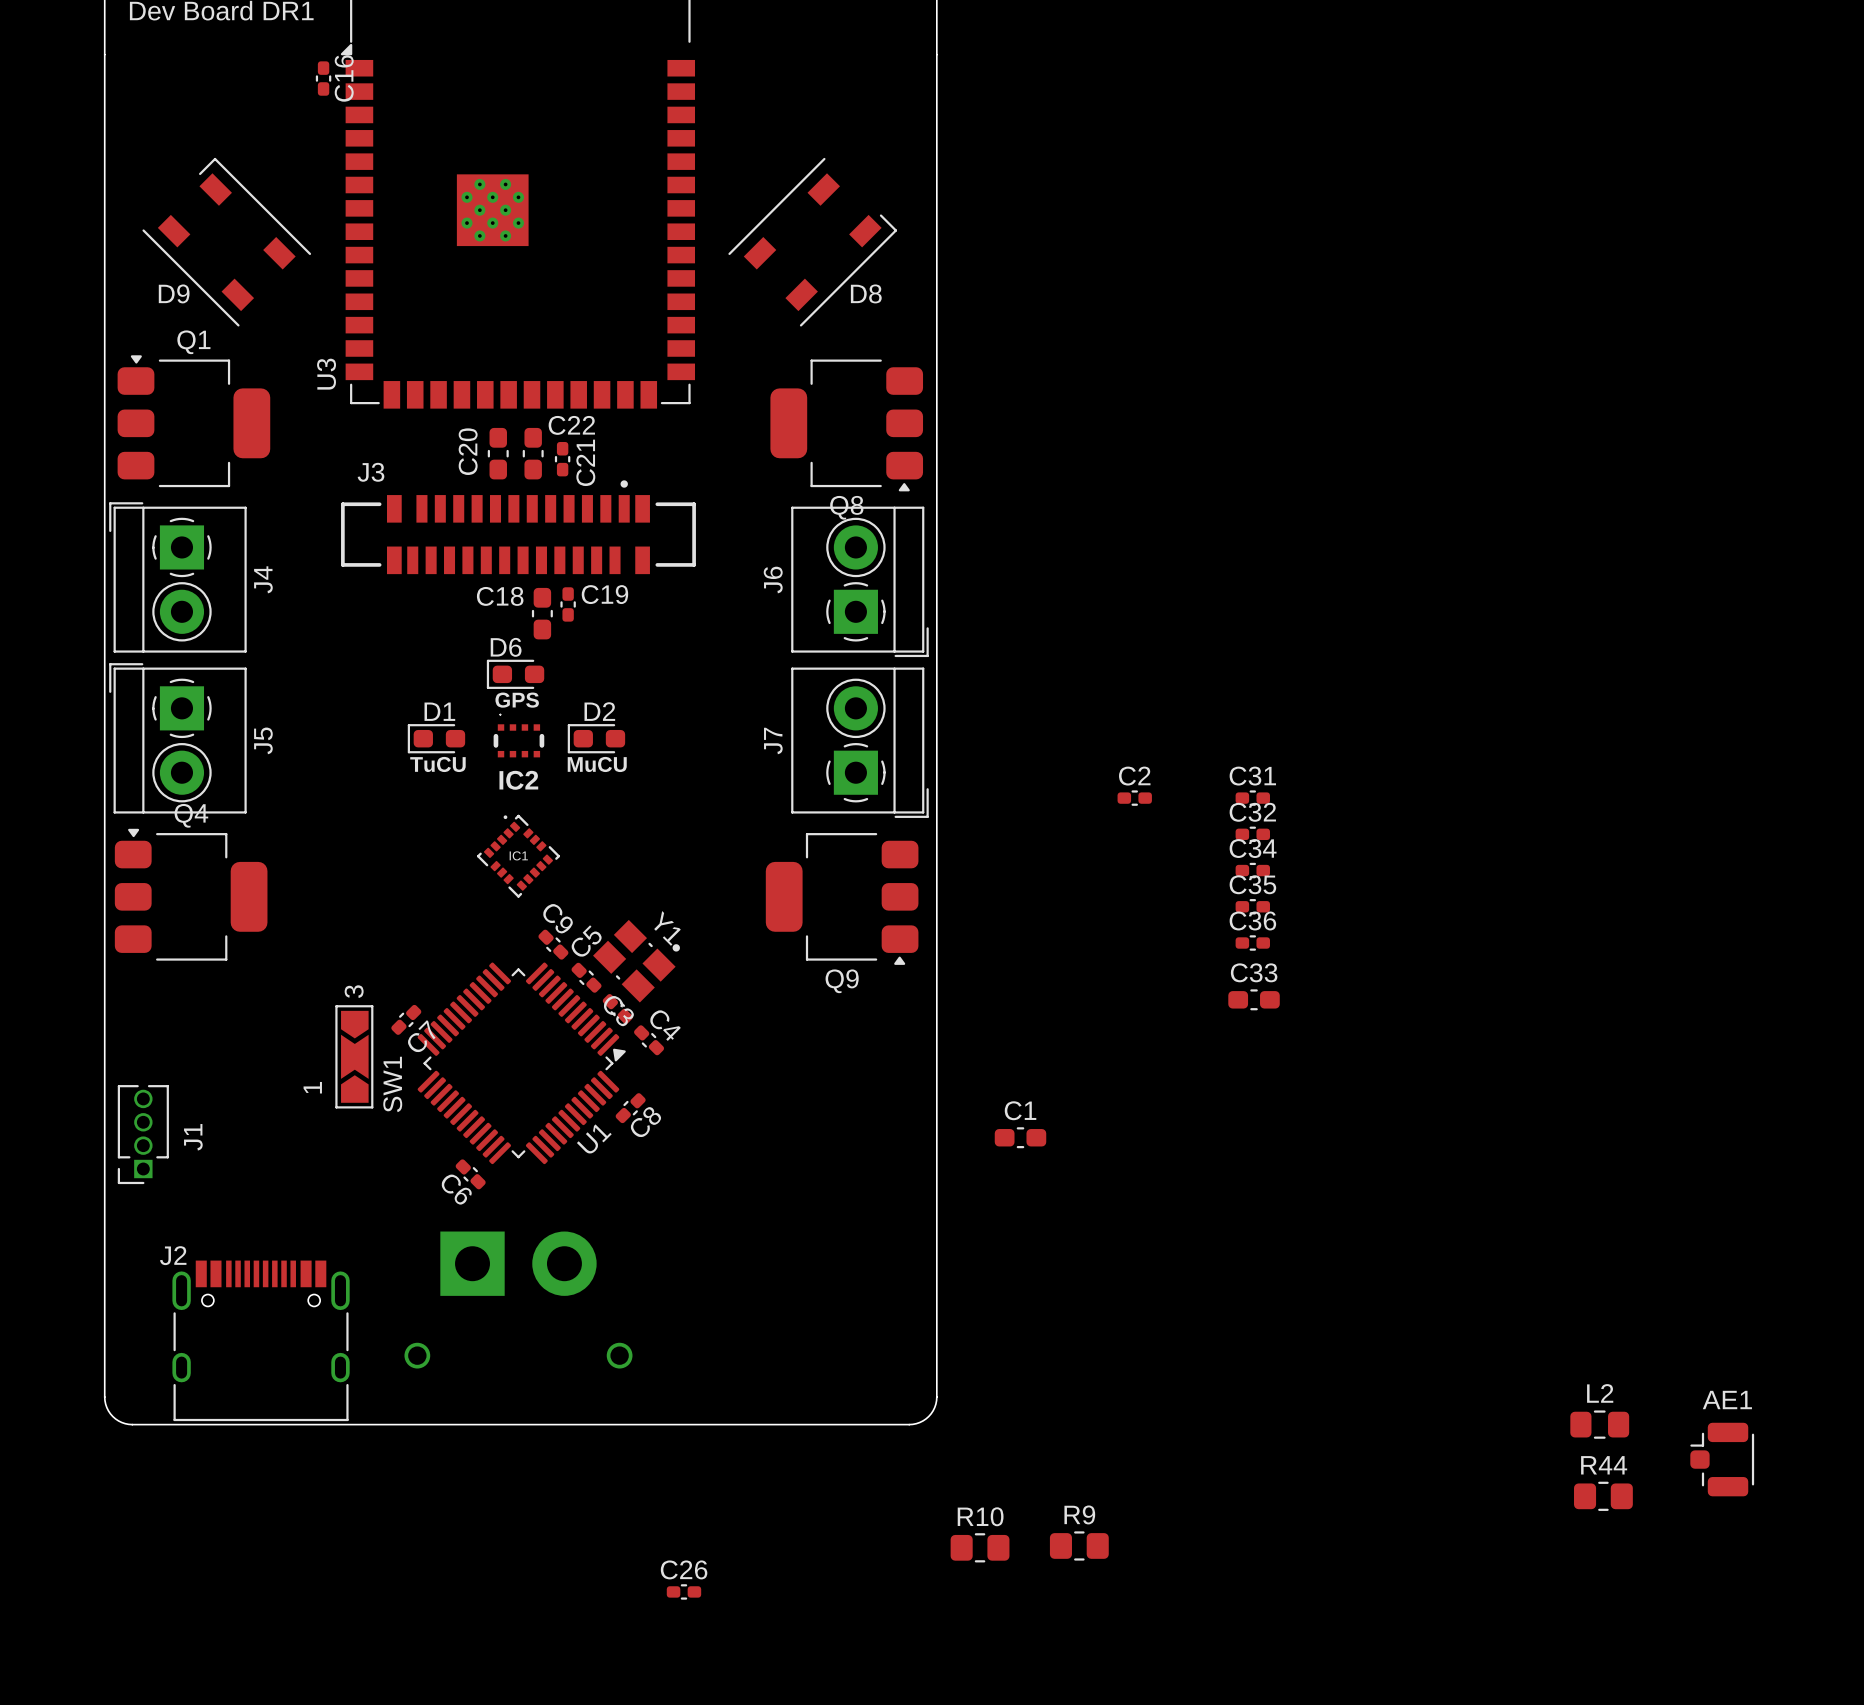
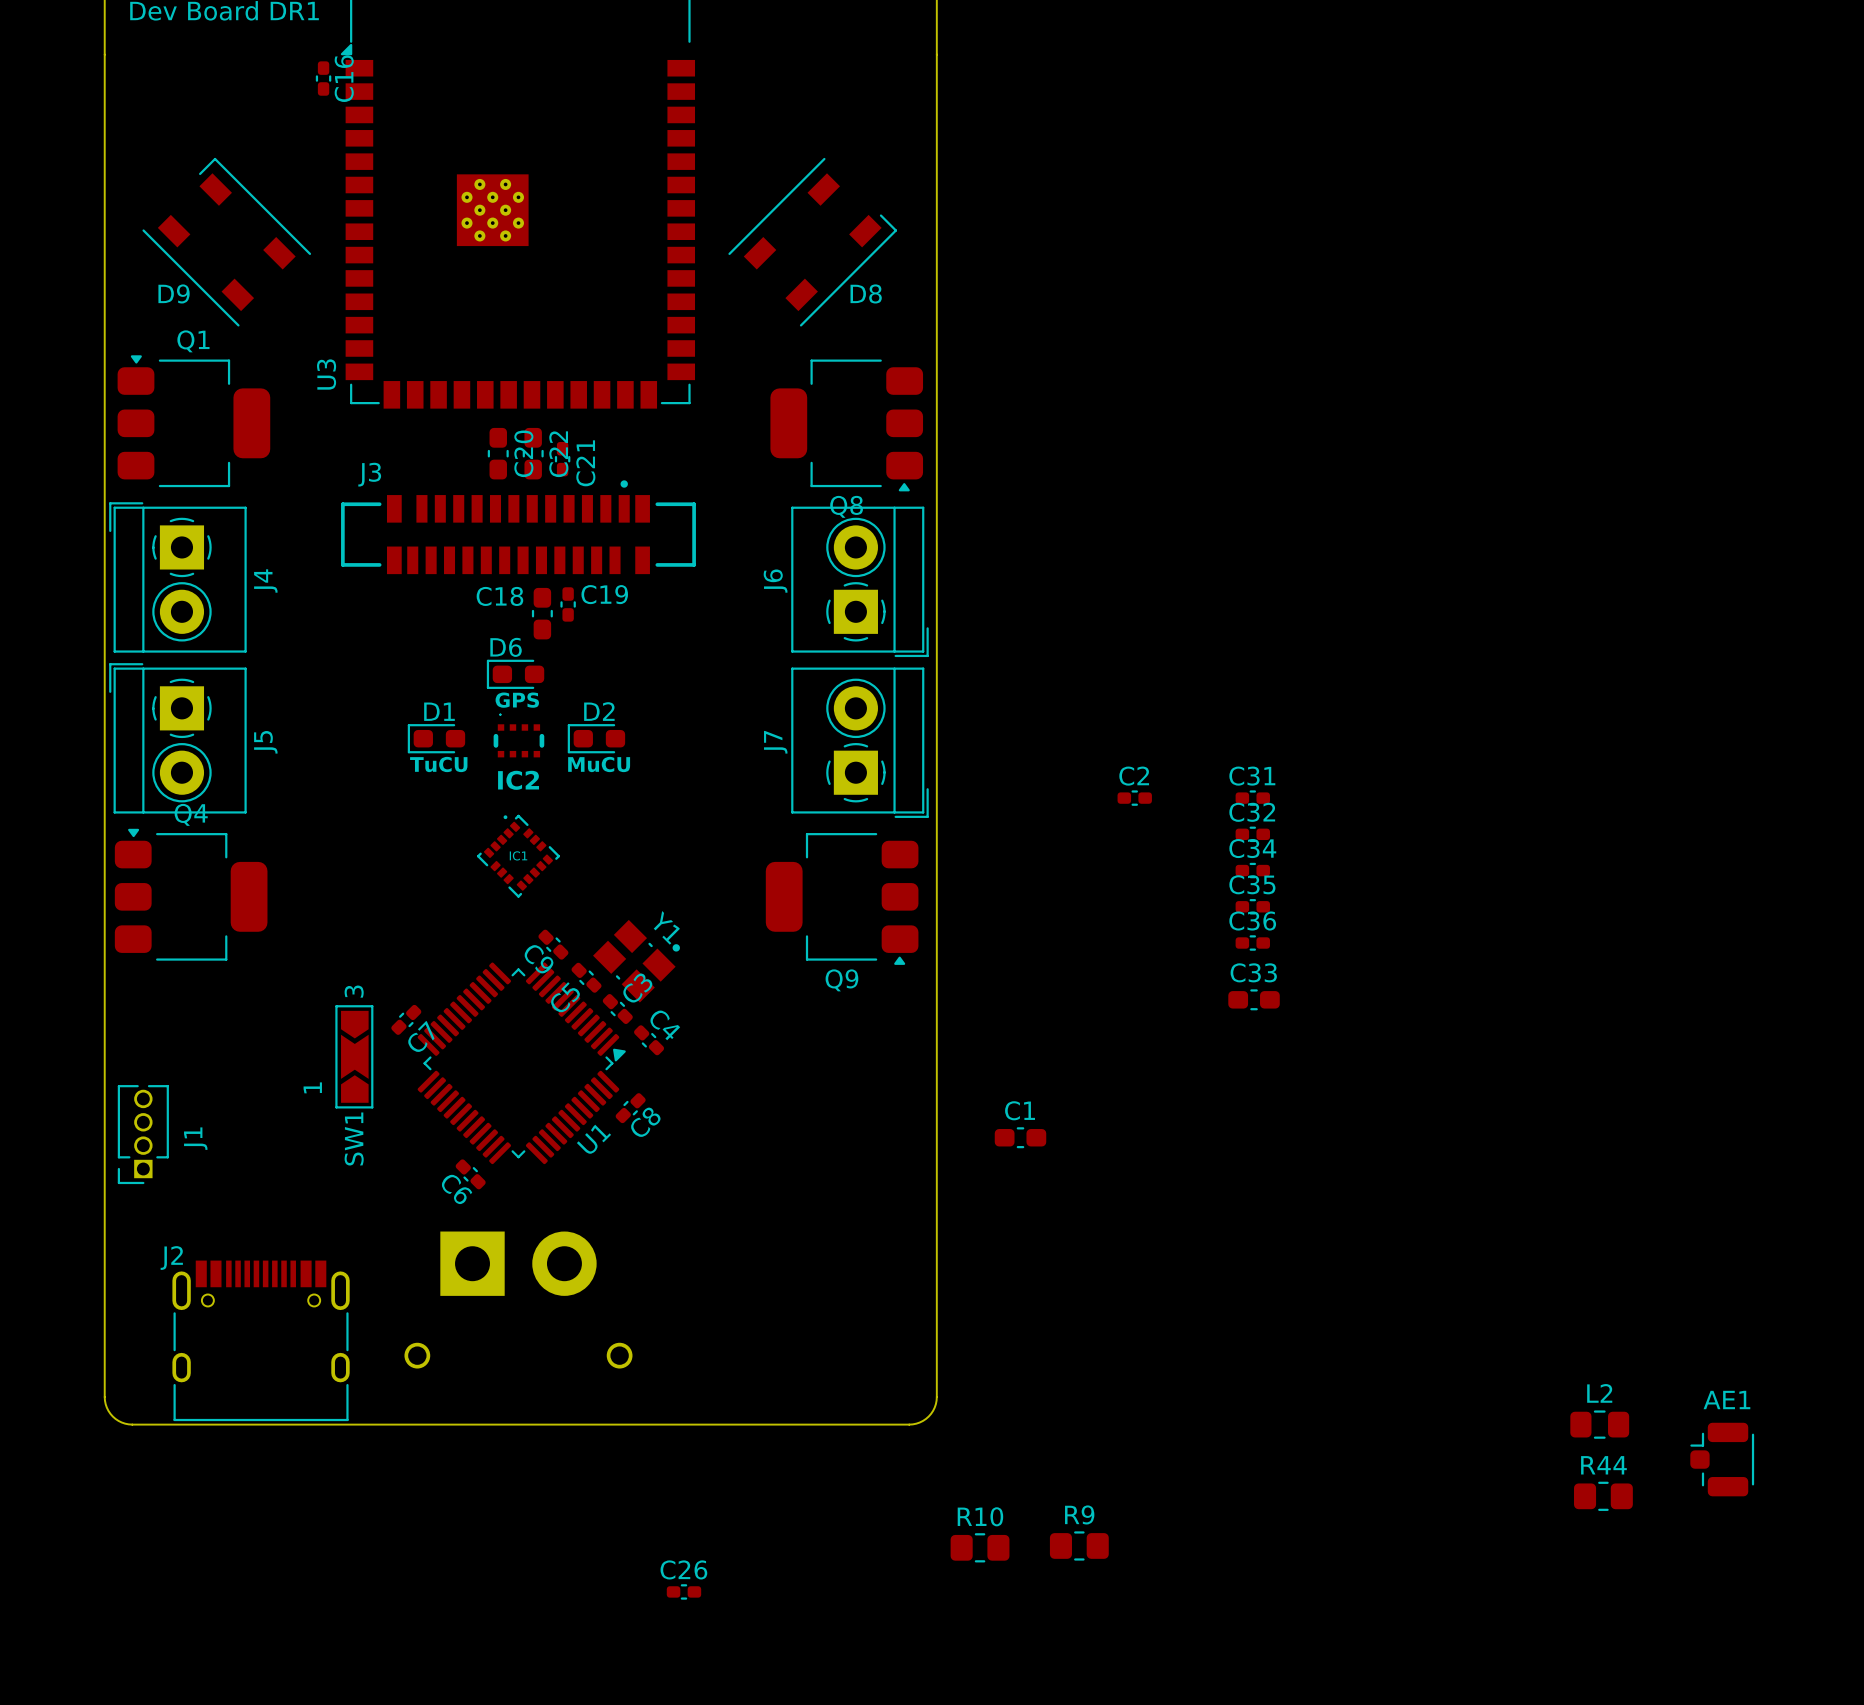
C22 name rotation: 0° (571, 425) -> 90° counterclockwise (558, 454)
C20 name position: C20 (468, 451) -> C20 (523, 453)
C9 name position: C9 (558, 918) -> C9 (539, 959)
C5 name position: C5 (586, 941) -> C5 (565, 997)
C3 name rotation: 0° (618, 1011) -> 90° counterclockwise (637, 987)
SW1 name position: SW1 (392, 1084) -> SW1 (354, 1138)

